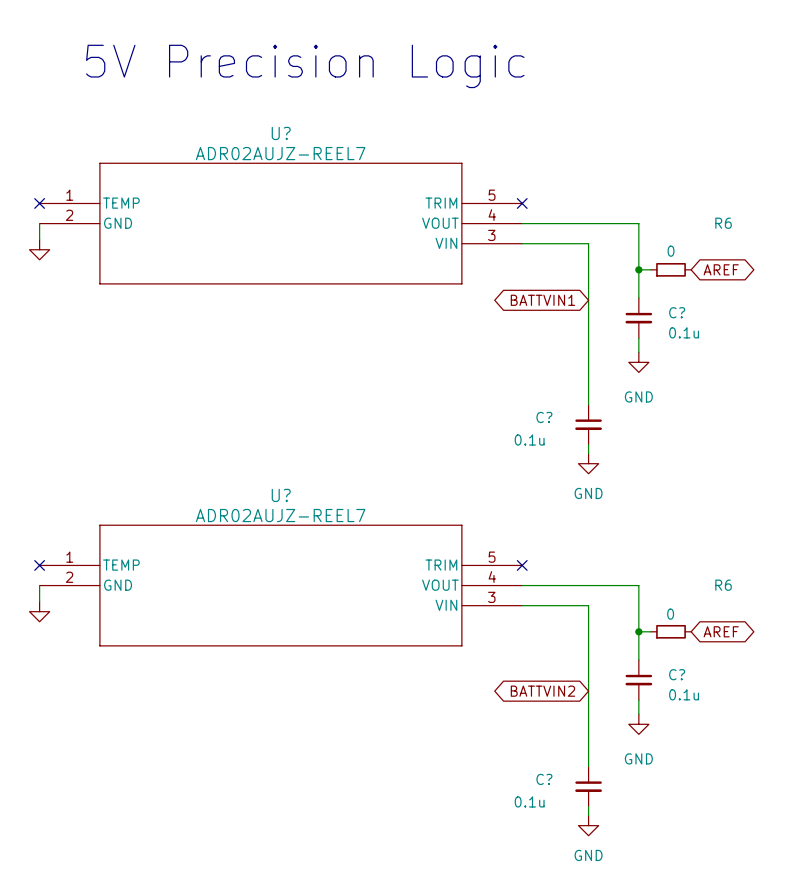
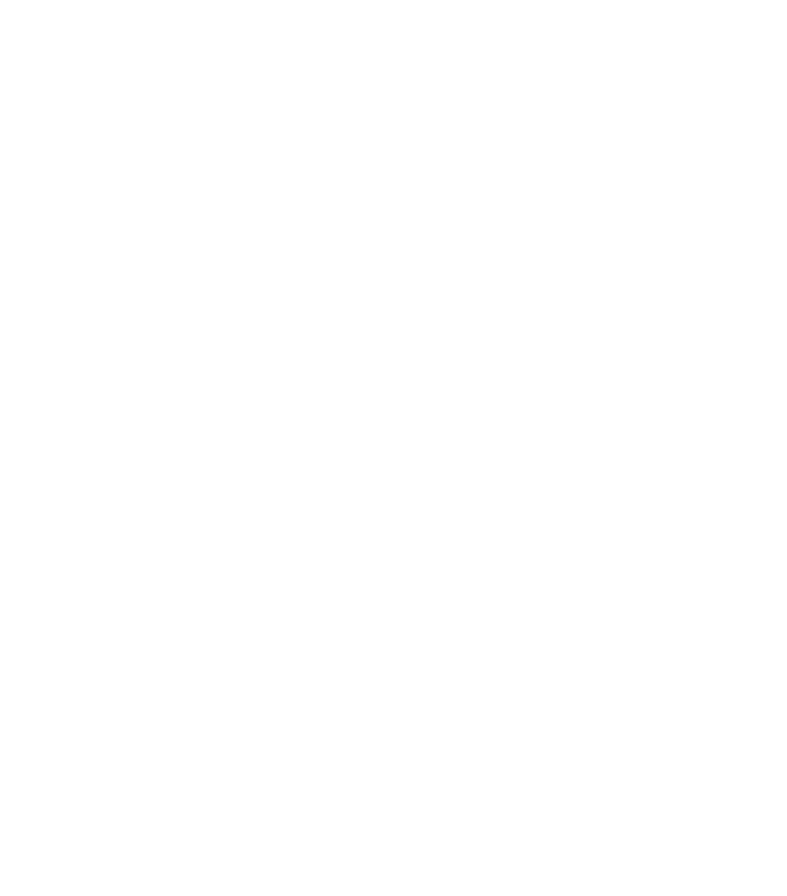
text: 5V Precision Logic (305, 66) -> none
no-connect mark: (39, 203) -> none
no-connect mark: (522, 203) -> none
wire: (39, 223) (39, 239) -> none
U?: ADR02AUJZ-REEL7 (280, 223) -> none
wire: (522, 223) (638, 223) (638, 298) -> none
wire: (522, 243) (588, 243) (588, 404) -> none
power symbol: (39, 249) -> none
wire: (638, 269) (650, 269) -> none
junction: (638, 269) -> none
R6: 0 (671, 269) -> none
global label: AREF (721, 269) -> none
global label: BATTVIN1 (542, 300) -> none
C?: 0.1u (638, 318) -> none
wire: (638, 338) (638, 352) -> none
power symbol: GND (638, 362) -> none
C?: 0.1u (588, 424) -> none
wire: (588, 444) (588, 453) -> none
power symbol: GND (588, 463) -> none
no-connect mark: (39, 565) -> none
no-connect mark: (522, 565) -> none
wire: (39, 585) (39, 601) -> none
U?: ADR02AUJZ-REEL7 (280, 585) -> none
wire: (522, 585) (638, 585) (638, 659) -> none
wire: (522, 605) (588, 605) (588, 766) -> none
power symbol: (39, 611) -> none
wire: (638, 631) (650, 631) -> none
junction: (638, 631) -> none
R6: 0 (671, 631) -> none
global label: AREF (721, 631) -> none
C?: 0.1u (638, 680) -> none
global label: BATTVIN2 (542, 691) -> none
wire: (638, 700) (638, 714) -> none
power symbol: GND (638, 724) -> none
C?: 0.1u (588, 786) -> none
wire: (588, 806) (588, 815) -> none
power symbol: GND (588, 825) -> none

